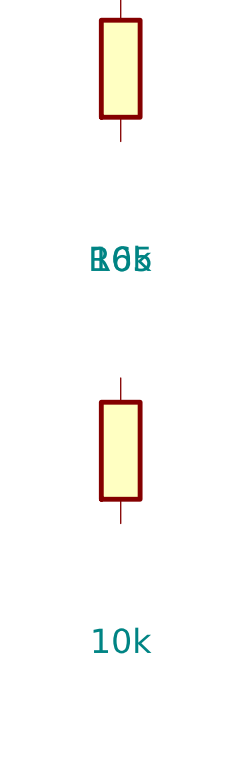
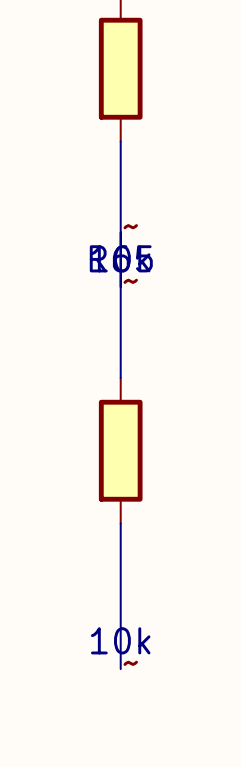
wire: none -> (120, 141) (120, 377)
label: none -> ~ (130, 226)
label: none -> ~ (130, 281)
wire: none -> (120, 523) (120, 669)
label: none -> ~ (130, 663)

